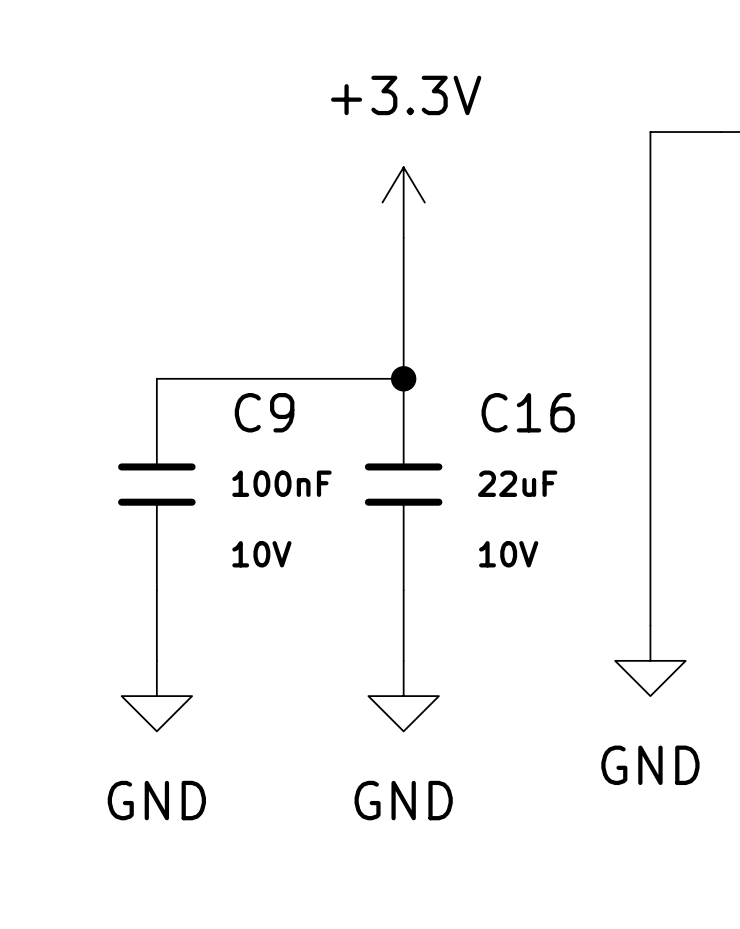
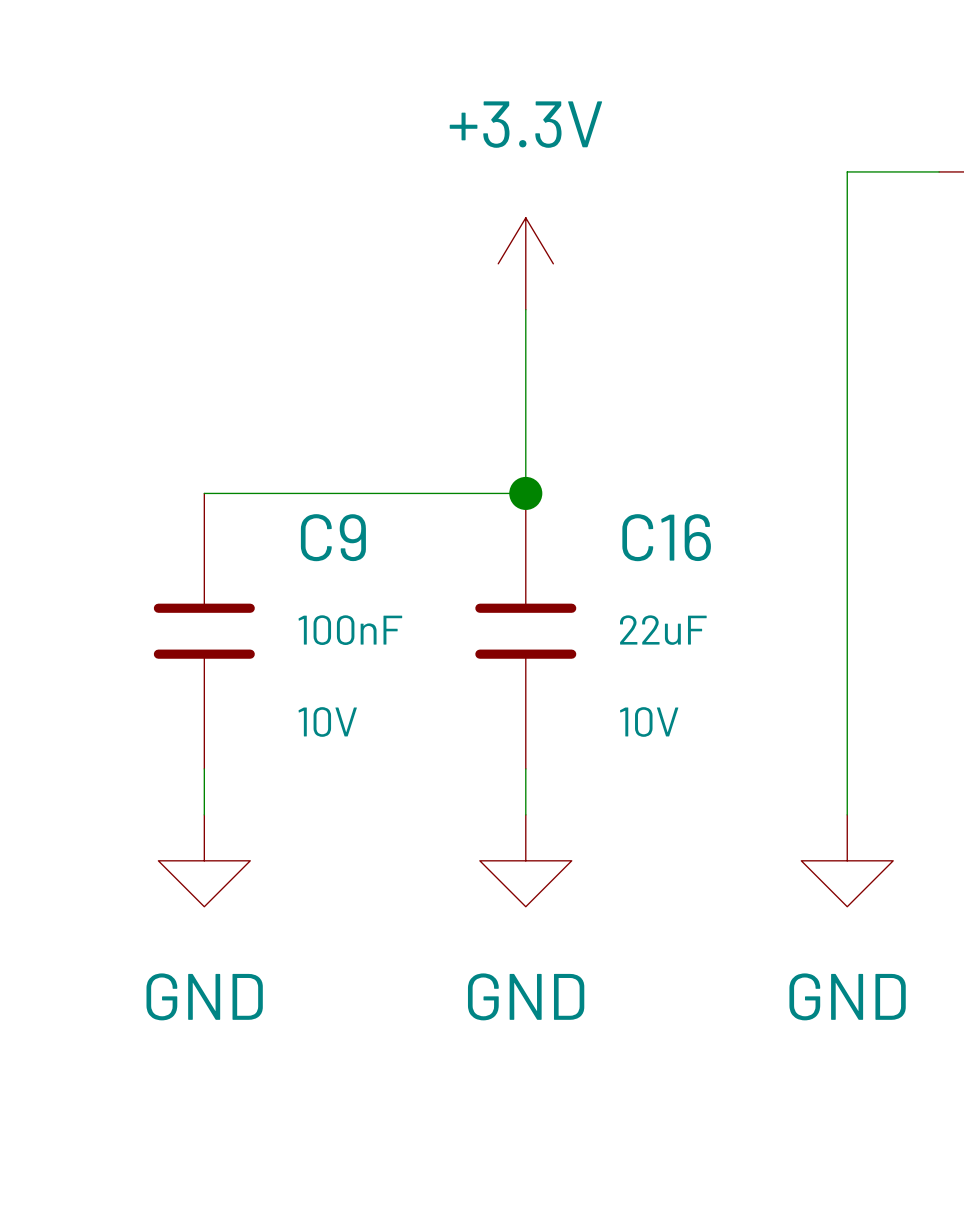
power symbol position: GND (156, 696) -> GND (204, 860)
power symbol position: GND (403, 696) -> GND (525, 860)

